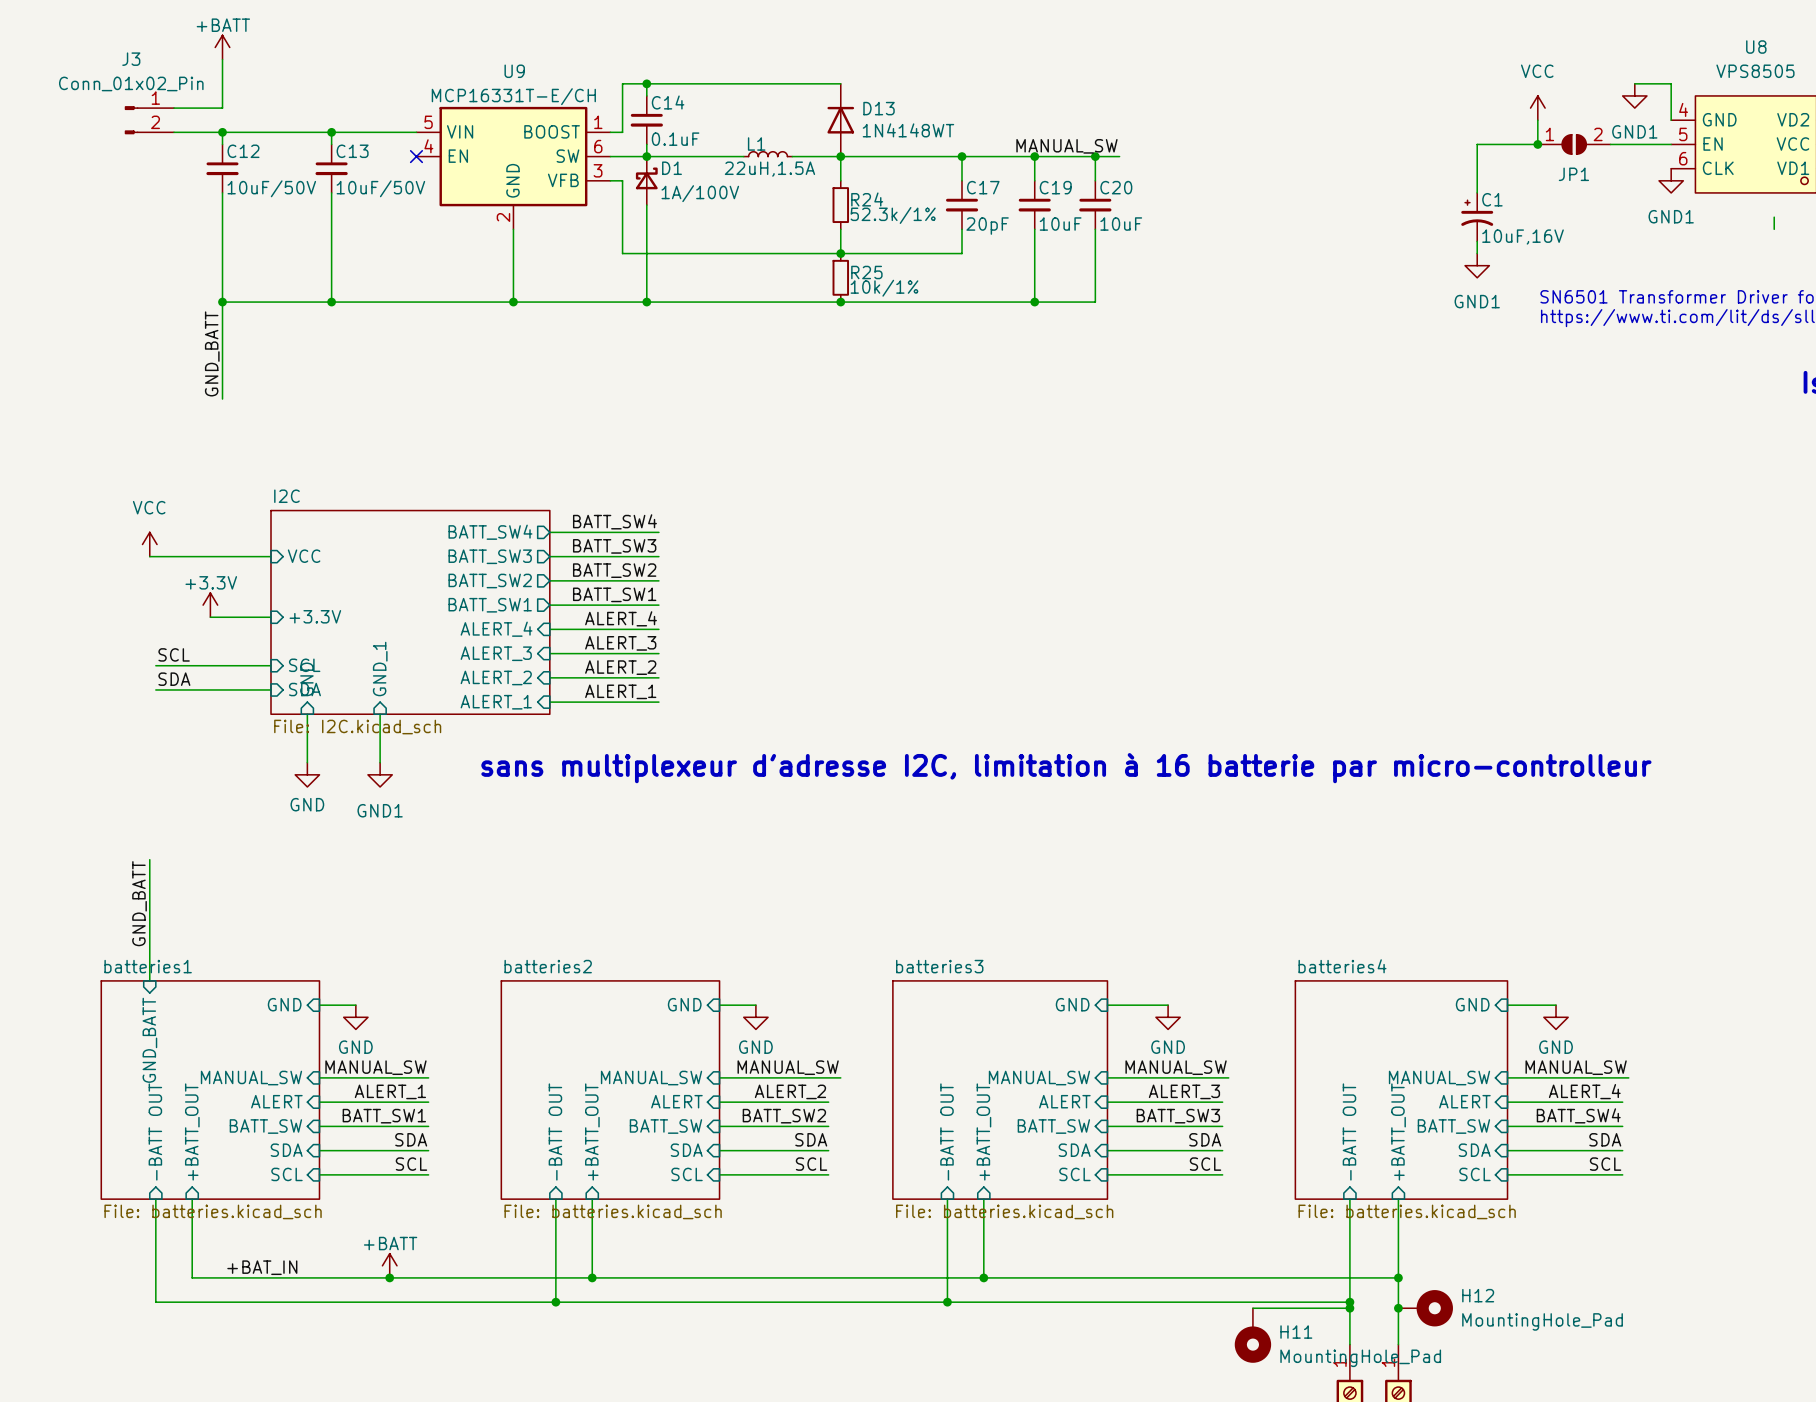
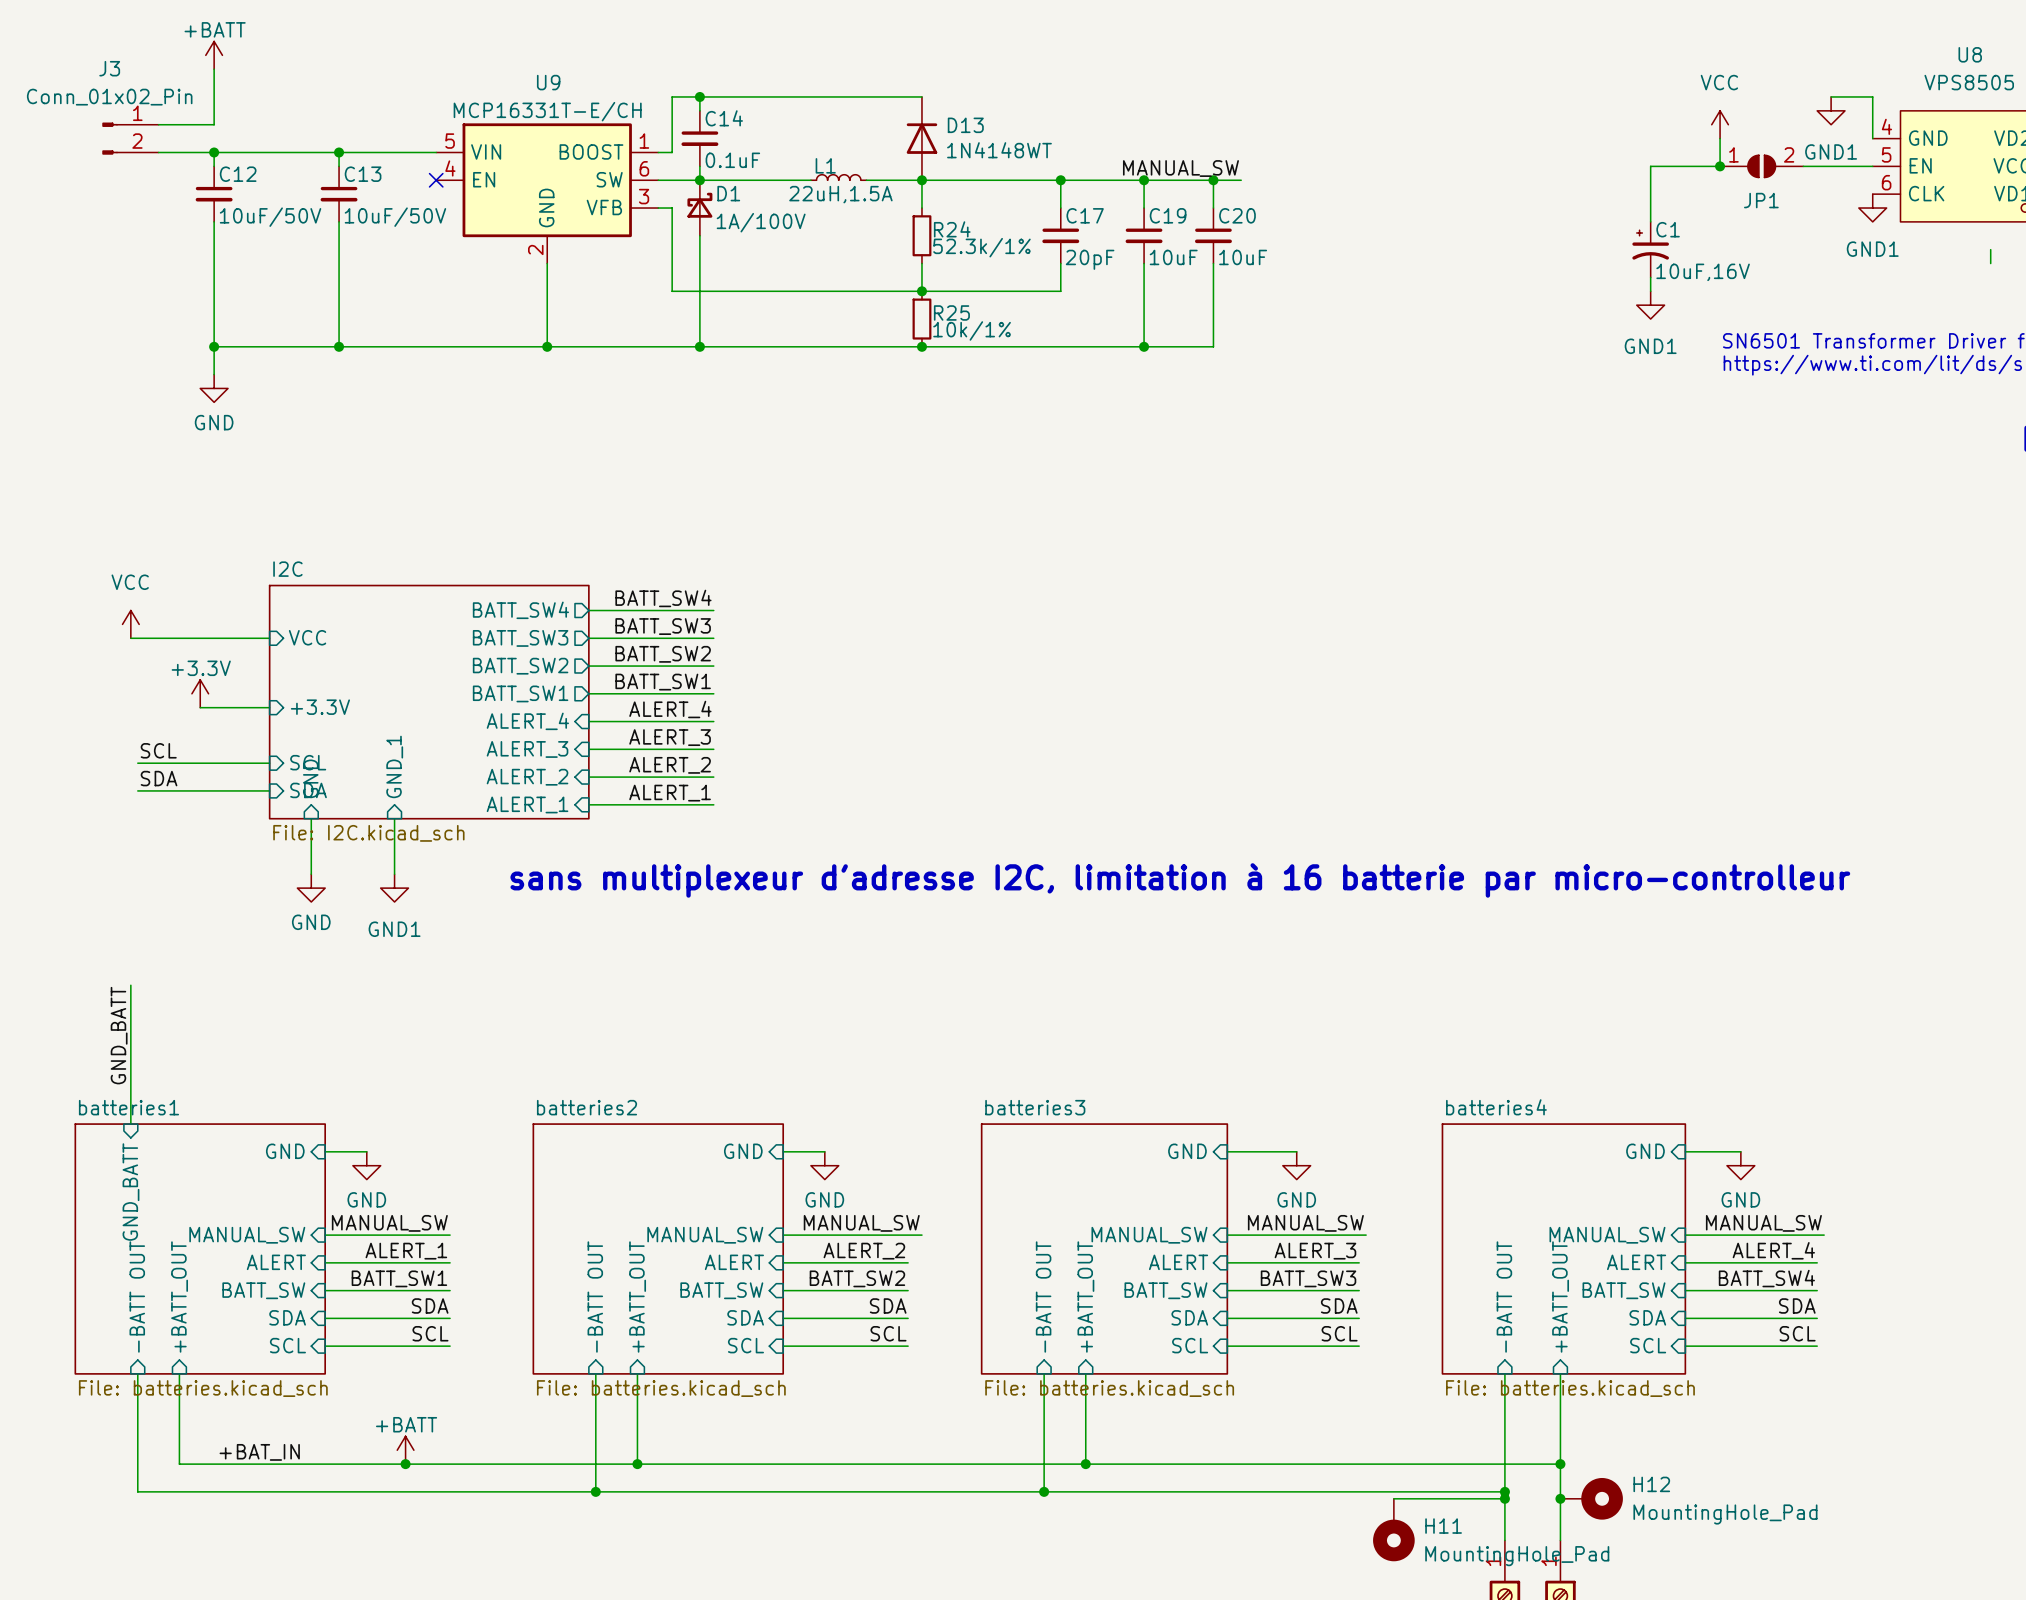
wire: (222, 326) (222, 399) -> none
power symbol: none -> GND (214, 388)
label: GND_BATT (212, 353) -> none

